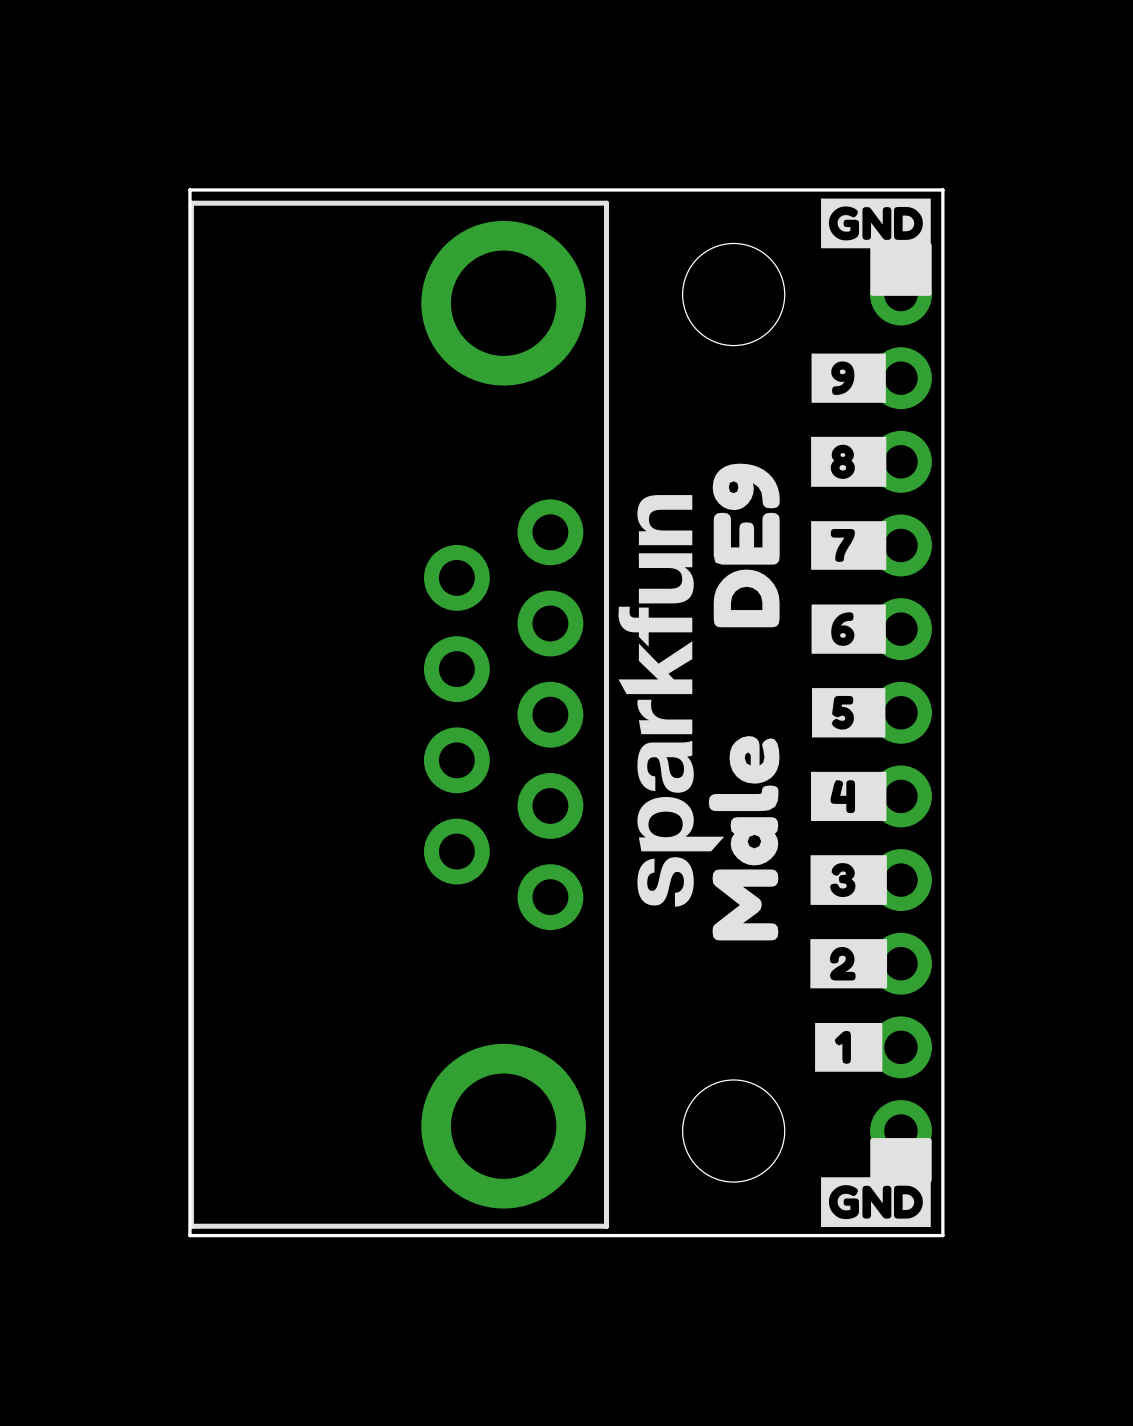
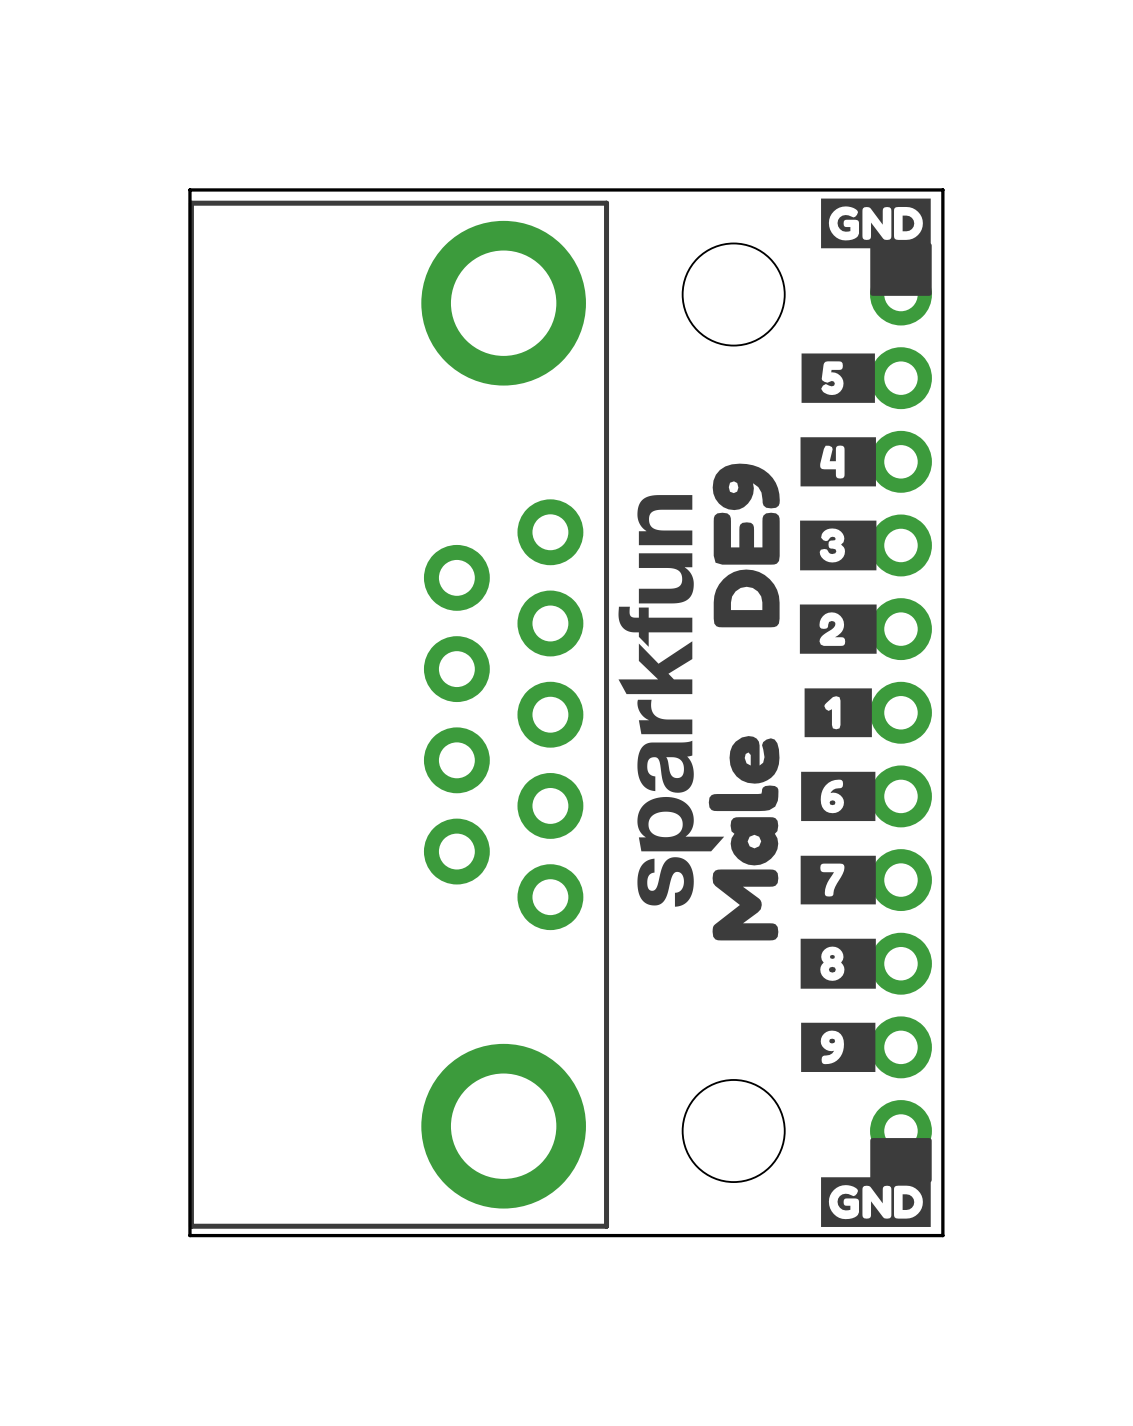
drawing position: (848, 378) -> (838, 1047)
drawing position: (848, 461) -> (838, 963)
drawing position: (848, 545) -> (838, 880)
drawing position: (848, 629) -> (838, 796)
drawing position: (848, 712) -> (838, 378)
drawing position: (848, 796) -> (838, 461)
drawing position: (848, 880) -> (838, 545)
drawing position: (848, 963) -> (838, 629)
drawing position: (848, 1047) -> (838, 712)

